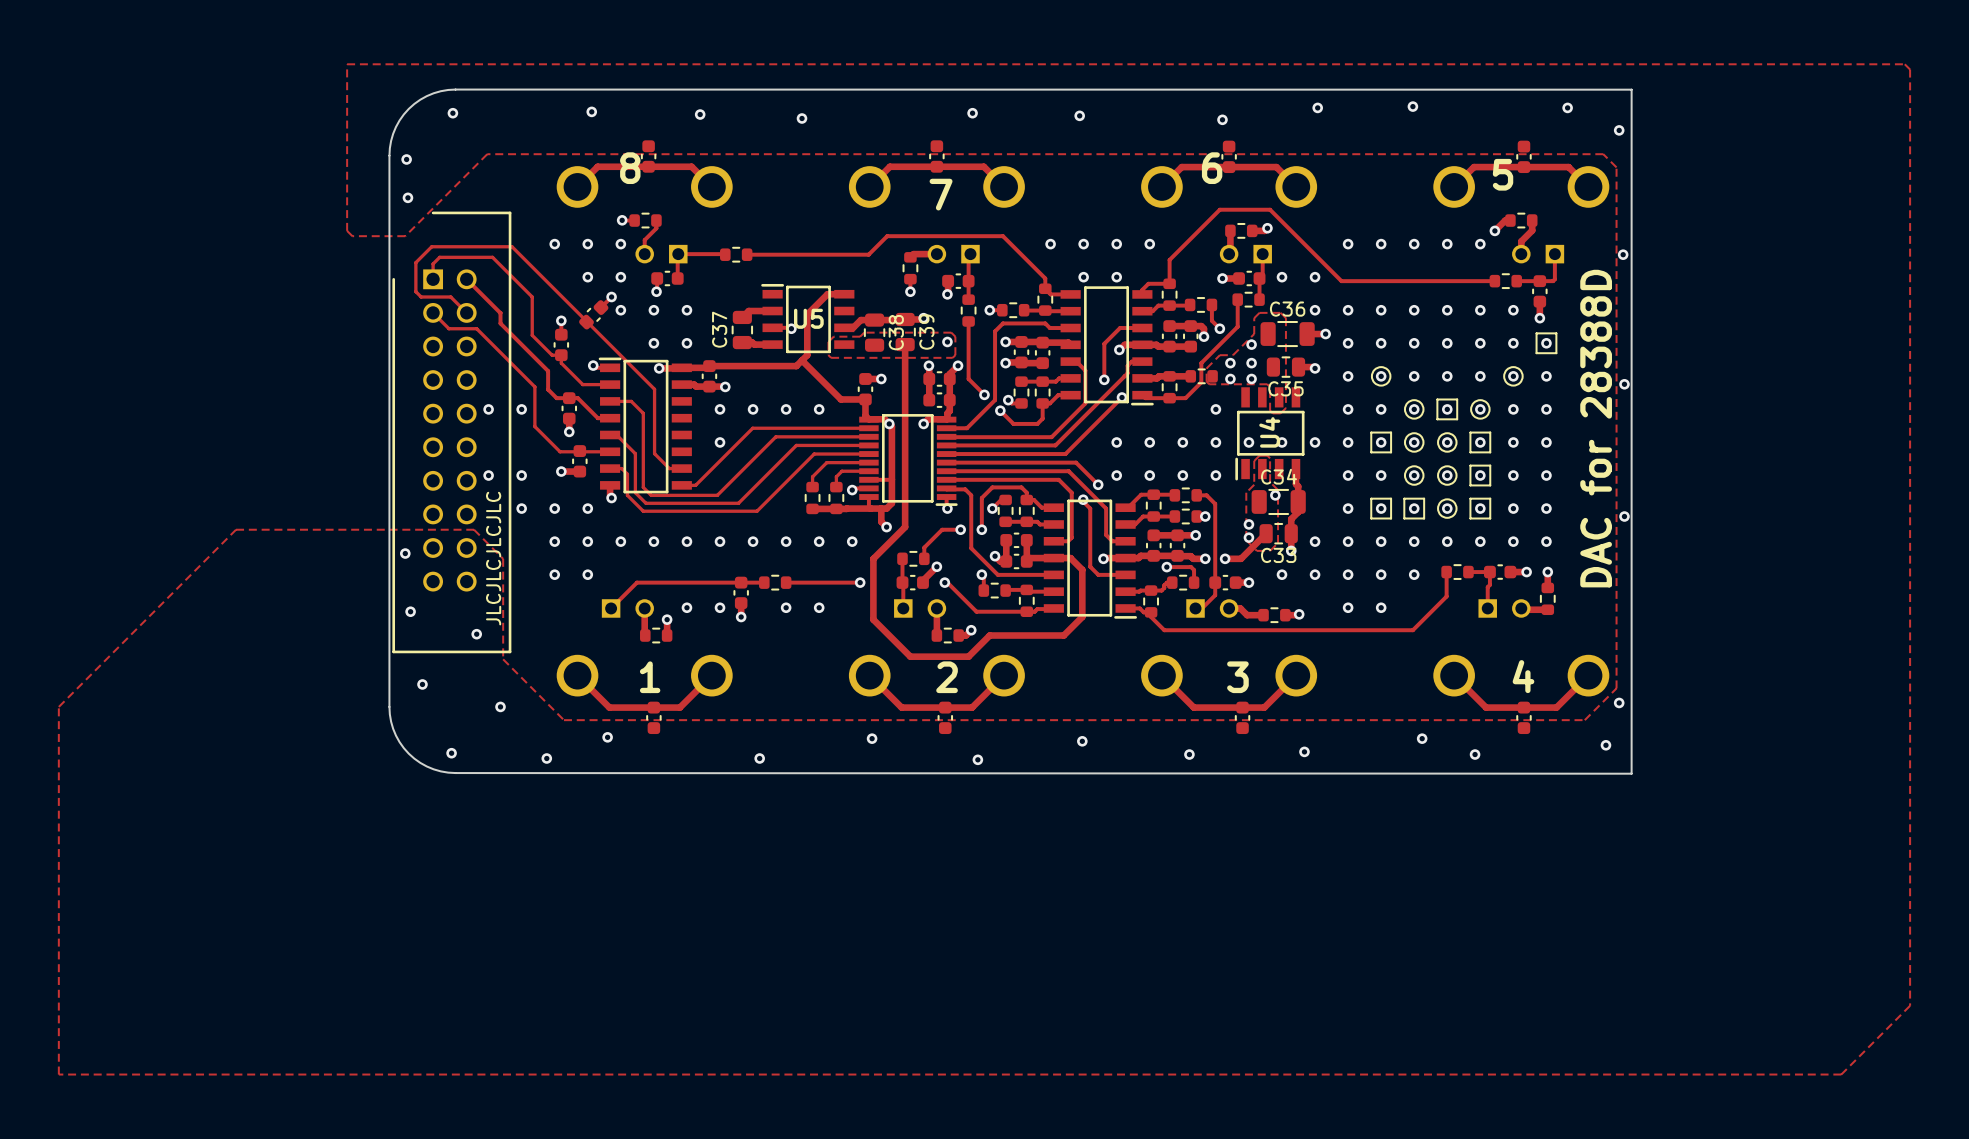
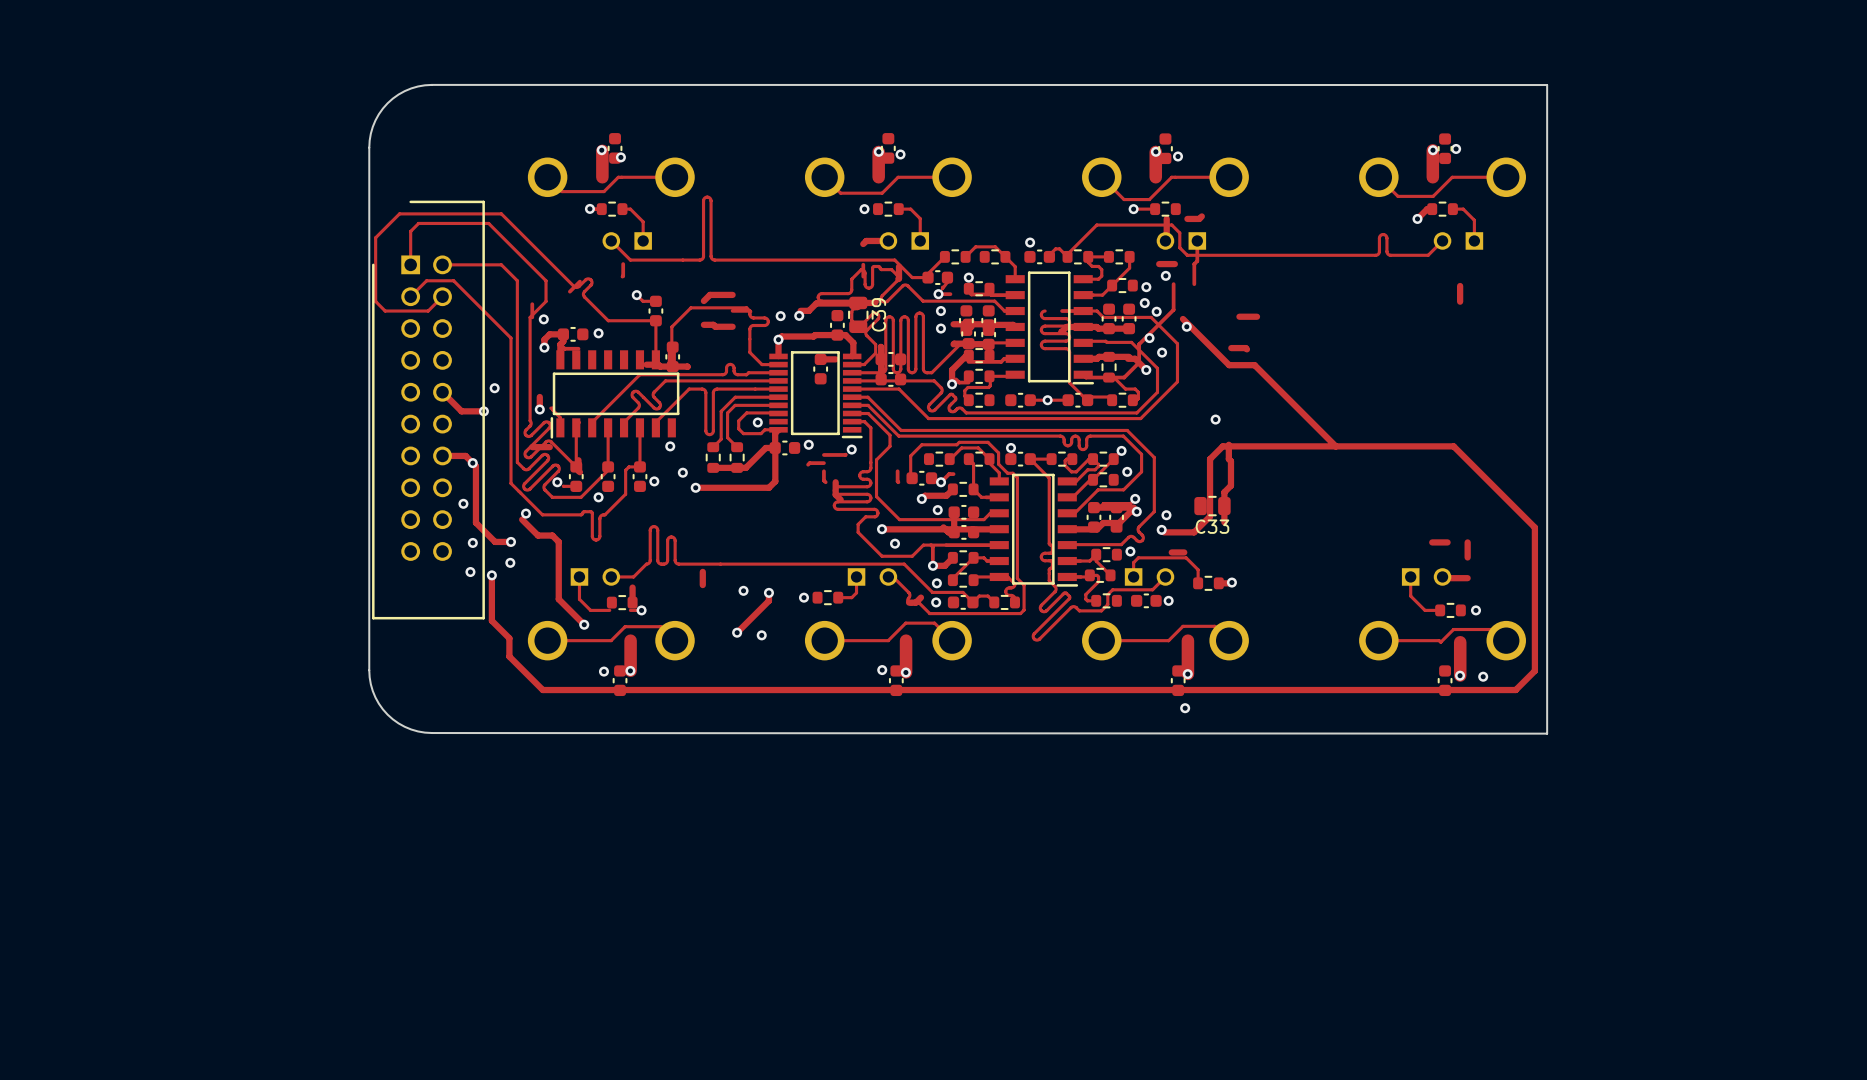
zone outline: (347, 64) (347, 230) (352, 236) (405, 236) (487, 154) (1603, 154) (1616, 167) (1616, 688) (1584, 720) (563, 720) (503, 659) (503, 558) (474, 529) (236, 529) (58, 706) (58, 1074) (1841, 1074) (1910, 1005) (1910, 69) (1904, 64) (347, 64) -> none
via: (1412, 106) -> none
via: (1317, 107) -> none
via: (1567, 107) -> none
via: (591, 111) -> none
via: (452, 113) -> none
via: (972, 113) -> none
via: (700, 114) -> none
via: (1079, 115) -> none
via: (801, 118) -> none
via: (1222, 119) -> none
via: (1619, 130) -> none
via: none -> (1456, 148)
track: none -> (601, 150) (602, 177)
via: none -> (601, 150)
track: none -> (1432, 150) (1432, 177)
via: none -> (1432, 150)
via: (406, 159) -> none
track: none -> (878, 151) (878, 177)
via: none -> (878, 151)
track: none -> (1155, 151) (1155, 177)
via: none -> (1155, 151)
via: none -> (900, 154)
via: none -> (620, 157)
via: none -> (1178, 156)
text: 8 (630, 168) -> none
text: 6 (1212, 168) -> none
text: 5 (1503, 174) -> none
track: (577, 186) (597, 166) (691, 166) (711, 186) -> (547, 177) (561, 191) (604, 191) (618, 177) (675, 177)
track: (869, 186) (889, 166) (983, 166) (1004, 186) -> (824, 177) (840, 193) (882, 193) (898, 177) (952, 177)
track: (1161, 186) (1181, 167) (1276, 167) (1296, 186) -> (1101, 177) (1124, 199) (1149, 199) (1171, 177) (1229, 177)
track: (1454, 186) (1474, 167) (1568, 167) (1588, 186) -> (1378, 177) (1397, 196) (1433, 196) (1452, 177) (1506, 177)
text: 7 (941, 194) -> none
via: (407, 197) -> none
track: (656, 220) (656, 228) (644, 240) (644, 254) -> (622, 209) (630, 209) (643, 221) (643, 240)
via: none -> (864, 209)
part: none -> (888, 209)
track: none -> (1133, 209) (1155, 209)
via: none -> (1133, 209)
track: (1532, 220) (1532, 230) (1521, 241) (1521, 254) -> (1452, 209) (1463, 209) (1474, 220) (1474, 240)
via: (1267, 228) -> none
part position: (1241, 230) -> (1165, 209)
via: (554, 244) -> none
via: (587, 244) -> none
via: (620, 244) -> none
via: (1050, 244) -> none
via: (1083, 244) -> none
via: (1116, 244) -> none
via: (1149, 244) -> none
via: (1348, 244) -> none
via: (1381, 244) -> none
via: (1414, 244) -> none
via: (1447, 244) -> none
via: (1480, 244) -> none
track: none -> (611, 240) (630, 260) (701, 259) (703, 256) (703, 200) (707, 197) (711, 200) (711, 256) (713, 259) (894, 260) (912, 277) (928, 277) (928, 273) (944, 256)
track: (725, 254) (678, 254) (677, 278) -> none
part: (736, 254) -> none
track: (747, 254) (868, 254) (887, 236) (1002, 236) (1045, 278) (1045, 289) (1050, 294) (1070, 294) -> (965, 256) (975, 246) (995, 246) (1015, 266) (1015, 279)
track: (970, 254) (968, 256) (968, 299) -> (920, 240) (920, 218) (910, 209) (898, 209)
track: none -> (1442, 240) (1428, 255) (1389, 255) (1386, 252) (1386, 237) (1383, 234) (1379, 237) (1379, 252) (1376, 255) (1187, 255) (1179, 247) (1179, 233) (1171, 225) (1096, 225) (1067, 254) (1067, 256) (1059, 248) (1055, 248) (1049, 256)
track: (1554, 254) (1554, 279) (1553, 281) (1516, 281) -> none
via: (1623, 254) -> none
via: none -> (1030, 242)
track: (433, 263) (439, 257) (492, 257) (532, 297) (532, 335) (552, 355) (561, 355) (561, 363) (582, 384) (610, 384) -> (410, 250) (410, 231) (418, 223) (488, 223) (546, 280) (546, 301) (530, 317) (531, 423) (525, 433) (530, 435) (545, 421) (549, 422) (550, 426) (525, 451) (525, 456) (530, 457) (546, 441) (549, 441) (576, 466) (576, 425) (579, 422)
part: (910, 268) -> none
part: none -> (955, 256)
part: none -> (995, 256)
part: none -> (1039, 256)
part: none -> (1077, 256)
part: none -> (1119, 256)
via: (587, 277) -> none
via: (620, 277) -> none
via: (1083, 277) -> none
via: (1116, 277) -> none
via: (1282, 277) -> none
via: (1315, 277) -> none
part: (667, 278) -> none
via: (1222, 278) -> none
part: (1249, 278) -> none
track: (466, 279) (500, 312) -> (442, 264) (501, 264) (517, 280) (517, 462) (526, 469) (543, 454) (546, 454) (548, 458) (524, 483) (524, 488) (529, 489) (556, 465) (559, 470) (544, 484) (544, 489) (552, 497) (581, 497) (608, 470) (608, 427)
part position: (958, 281) -> (937, 277)
track: (1494, 281) (1341, 281) (1270, 209) (1219, 209) (1169, 259) (1169, 283) (1148, 283) (1142, 289) (1142, 294) -> (1108, 256) (1088, 256) (1088, 262) (1092, 266) (1098, 266) (1101, 269) (1101, 276) (1098, 279) (1083, 279)
part: (1505, 281) -> none
via: none -> (1165, 275)
via: (656, 291) -> none
via: (910, 291) -> none
part: (1539, 291) -> none
track: none -> (947, 277) (947, 282) (942, 288) (942, 287)
via: none -> (968, 277)
track: (844, 294) (827, 294) (807, 314) (807, 355) (796, 366) (659, 368) -> none
via: (947, 294) -> none
part: (1169, 294) -> none
via: (611, 297) -> none
part: (1045, 299) -> none
part: (1248, 299) -> none
part: none -> (1122, 285)
via: none -> (1146, 287)
part: none -> (979, 288)
track: (1190, 304) (1158, 305) (1152, 311) -> (1129, 256) (1129, 268) (1102, 295) (1093, 295)
part: (1201, 304) -> none
track: (1211, 304) (1211, 320) (1219, 328) -> none
via: (620, 310) -> none
via: (653, 310) -> none
track: none -> (635, 294) (643, 301) (655, 301)
via: (686, 310) -> none
part: (968, 310) -> none
part: (1013, 310) -> none
via: (1315, 310) -> none
via: (1348, 310) -> none
via: (1381, 310) -> none
via: (1414, 310) -> none
via: (1447, 310) -> none
via: (1480, 310) -> none
via: (1513, 310) -> none
via: none -> (636, 295)
track: (433, 312) (448, 328) (476, 328) (534, 386) (534, 426) (560, 451) (610, 451) -> (410, 296) (426, 280) (453, 280) (510, 338) (510, 483) (542, 514) (581, 514) (583, 511) (591, 511) (592, 537) (595, 539) (598, 538) (600, 516) (604, 514) (625, 494) (625, 470) (628, 466) (639, 466) (639, 427)
track: (466, 312) (450, 297) (421, 297) (415, 291) (415, 262) (431, 246) (512, 246) (654, 389) (654, 453) (669, 468) (681, 468) -> (442, 296) (428, 311) (385, 311) (375, 301) (375, 237) (399, 213) (501, 213) (574, 286) (578, 286) (587, 279) (590, 279) (591, 284) (584, 292) (583, 295) (608, 320) (655, 320) (655, 359)
track: (500, 312) (500, 323) (548, 371) (548, 389) (556, 398) (577, 398) (597, 418) (610, 418) -> none
zone outline: (1259, 312) (1254, 318) (1254, 334) (1233, 355) (1219, 355) (1206, 368) (1206, 381) (1209, 384) (1267, 384) (1270, 386) (1270, 410) (1272, 413) (1280, 413) (1285, 408) (1285, 318) (1280, 312) (1259, 312) -> none
part: (593, 314) -> none
U5: (807, 318) -> none
via: (923, 318) -> none
via: (1539, 318) -> none
via: none -> (1144, 303)
via: (561, 320) -> none
track: (968, 321) (968, 378) (984, 394) -> none
track: (1169, 326) (1201, 326) (1203, 328) (1203, 336) -> none
part: none -> (655, 311)
via: (791, 328) -> none
via: none -> (940, 311)
track: (1059, 328) (1049, 328) (1045, 323) (1002, 323) (995, 331) (995, 400) (966, 428) (946, 428) -> (1004, 311) (994, 301) (923, 301) (905, 284) (887, 301) (883, 301) (881, 296) (897, 280) (897, 276) (891, 269) (881, 269) (879, 266) (873, 266) (872, 285) (868, 288) (865, 285) (864, 271) (861, 269) (851, 279) (849, 293) (821, 293) (818, 296) (821, 301) (859, 301) (860, 307) (851, 311) (851, 320) (857, 325) (861, 325) (873, 313) (878, 315) (878, 319) (865, 332) (875, 344) (875, 353) (864, 364) (852, 364)
track: none -> (1045, 311) (1041, 314) (1043, 318) (1066, 318) (1069, 322) (1066, 326) (1043, 326) (1041, 329) (1042, 332) (1066, 333) (1069, 337) (1066, 341) (1043, 341) (1042, 347) (1068, 350) (1069, 382) (1086, 400) (1092, 397) (1108, 397) (1112, 400)
track: (1120, 328) (1104, 343) (1104, 379) -> none
track: none -> (1083, 311) (1096, 311) (1103, 317) (1151, 317) (1177, 343) (1177, 381) (1140, 418) (928, 418) (899, 389) (852, 389)
C37: (742, 330) -> none
zone outline: (864, 332) (951, 332) (955, 336) (955, 355) (952, 357) (831, 357) (828, 355) (828, 341) (833, 336) (860, 336) (864, 332) -> none
C38: (874, 332) -> none
via: none -> (780, 316)
via: none -> (799, 315)
line: (1536, 333) (1556, 333) (1556, 353) (1536, 353) (1536, 333) -> none
C36: (1287, 334) -> none
via: (1325, 334) -> none
via: none -> (543, 319)
via: (1203, 336) -> none
track: none -> (1182, 318) (1229, 365) (1254, 365) (1335, 446)
part: none -> (966, 320)
part: none -> (988, 320)
via: (947, 341) -> none
via: (1005, 341) -> none
via: (653, 343) -> none
via: (686, 343) -> none
part: none -> (837, 325)
via: (1348, 343) -> none
via: (1381, 343) -> none
via: (1414, 343) -> none
via: (1447, 343) -> none
via: (1480, 343) -> none
via: (1513, 343) -> none
via: (1546, 343) -> none
part: (561, 344) -> none
track: (905, 344) (905, 527) (873, 558) (873, 619) (910, 656) (968, 656) (989, 635) (1063, 635) (1082, 617) (1082, 569) (1070, 558) (1030, 558) (1026, 561) (1026, 540) -> none
via: none -> (940, 328)
via: (1119, 349) -> none
via: none -> (598, 333)
part: none -> (573, 334)
via: none -> (1149, 338)
via: none -> (778, 339)
track: (801, 360) (841, 399) (865, 399) (865, 415) (868, 419) (884, 419) (891, 426) (891, 503) (886, 508) (812, 508) -> none
track: (1070, 361) (1076, 361) (1085, 370) (1085, 403) (1051, 437) (946, 436) -> (1015, 342) (961, 342) (931, 372) (926, 372) (923, 369) (923, 316) (918, 313) (915, 316) (915, 370) (912, 372) (908, 369) (908, 320) (904, 316) (900, 320) (900, 369) (896, 372) (893, 369) (893, 320) (889, 316) (885, 320) (885, 370) (882, 372) (852, 372)
track: (1142, 361) (1131, 361) (1127, 365) (1127, 373) (1055, 445) (946, 445) -> (1083, 342) (1084, 341) (1131, 342) (1157, 368) (1157, 392) (1136, 412) (966, 412) (960, 407) (953, 411) (949, 410) (949, 406) (955, 399) (951, 394) (934, 410) (929, 409) (929, 405) (942, 390) (934, 380) (852, 380)
via: (1005, 363) -> none
via: (1230, 363) -> none
via: (1251, 363) -> none
via: (593, 365) -> none
via: (928, 365) -> none
track: (958, 365) (949, 374) (949, 411) (947, 413) (947, 418) (928, 419) (923, 423) -> none
via: (958, 365) -> none
track: none -> (544, 347) (544, 339) (549, 334) (563, 334) (563, 341) (560, 344) (560, 359)
via: none -> (544, 347)
drawing: [1370, 366, 1392, 387] -> none
drawing: [1503, 366, 1524, 387] -> none
C35: (1285, 367) -> none
via: (659, 368) -> none
via: (1315, 368) -> none
via: none -> (1162, 352)
track: none -> (778, 356) (778, 339) (781, 336) (815, 335) (845, 335) (853, 342) (852, 356)
track: none -> (968, 355) (966, 355) (952, 369) (952, 384)
part: none -> (979, 355)
part: (1201, 376) -> none
via: (1348, 376) -> none
via: (1381, 376) -> none
via: (1414, 376) -> none
via: (1447, 376) -> none
via: (1480, 376) -> none
via: (1513, 376) -> none
via: (1546, 376) -> none
via: (881, 378) -> none
track: none -> (1128, 358) (1135, 358) (1146, 370)
via: (1230, 378) -> none
via: (1251, 378) -> none
track: none -> (671, 359) (671, 326) (690, 307) (746, 307) (751, 317) (765, 318) (768, 321) (765, 325) (750, 327) (749, 352) (762, 364) (778, 364)
via: (1104, 379) -> none
via: (1624, 384) -> none
via: (725, 386) -> none
via: none -> (1146, 370)
part: (1021, 392) -> none
part: (1042, 392) -> none
track: none -> (778, 372) (737, 374) (734, 372) (733, 365) (730, 364) (727, 365) (726, 372) (723, 374) (639, 374) (592, 422) (592, 427)
via: (984, 394) -> none
track: (1070, 395) (1058, 395) (1049, 403) (1042, 403) (1042, 418) (1037, 423) (1013, 423) (1000, 410) -> (1015, 374) (989, 376) (988, 387) (967, 387) (964, 390) (964, 396) (968, 400)
part: none -> (979, 376)
track: (1122, 397) (1065, 454) (946, 454) -> none
via: (1122, 397) -> none
track: none -> (1114, 378) (1125, 389) (1135, 389) (1138, 392) (1138, 398) (1132, 400)
drawing: [1403, 399, 1458, 519] -> none
line: (1437, 399) (1457, 399) (1457, 419) (1437, 419) (1437, 399) -> none
drawing: [1470, 399, 1491, 420] -> none
via: (1008, 400) -> none
track: (610, 401) (631, 401) (643, 413) (643, 487) (651, 495) (717, 495) (775, 436) (868, 436) -> none
track: none -> (778, 380) (665, 380) (653, 393) (660, 404) (657, 408) (654, 408) (637, 391) (632, 392) (632, 396) (639, 406) (624, 422) (624, 427)
via: none -> (952, 384)
part: (569, 408) -> none
via: (488, 409) -> none
via: (720, 409) -> none
via: (753, 409) -> none
via: (786, 409) -> none
via: (819, 409) -> none
via: (1215, 409) -> none
via: (1348, 409) -> none
via: (1381, 409) -> none
via: (1414, 409) -> none
via: (1447, 409) -> none
via: (1480, 409) -> none
via: (1513, 409) -> none
via: (1546, 409) -> none
track: none -> (778, 389) (715, 389) (713, 392) (713, 431) (709, 434) (705, 431) (705, 391) (702, 389) (689, 389) (655, 422) (655, 427)
via: (1000, 410) -> none
track: none -> (442, 392) (461, 411) (483, 411)
track: none -> (778, 397) (735, 397) (721, 411) (721, 439) (713, 447)
part: none -> (979, 400)
part: none -> (1020, 400)
track: none -> (1030, 400) (1068, 400)
via: none -> (1047, 400)
part: none -> (1077, 400)
part: none -> (1122, 400)
via: (889, 423) -> none
via: (923, 423) -> none
part rotation: 0° (645, 425) -> 90° counterclockwise (615, 394)
track: none -> (778, 405) (735, 405) (727, 412) (727, 437) (737, 447)
track: (868, 428) (752, 428) (695, 485) (681, 485) -> none
text: DAC for 28388D (1596, 428) -> none
track: none -> (550, 408) (560, 417) (560, 427)
line: (1371, 432) (1391, 432) (1391, 452) (1371, 452) (1371, 432) -> none
line: (1470, 432) (1490, 432) (1490, 452) (1470, 452) (1470, 432) -> none
via: none -> (483, 411)
U4: (1269, 433) -> none
track: (610, 434) (616, 434) (635, 453) (635, 492) (645, 503) (738, 503) (796, 445) (868, 445) -> none
track: none -> (778, 413) (746, 412) (738, 420) (738, 428) (743, 433) (761, 433) (764, 429) (778, 429)
via: (720, 442) -> none
via: (1116, 442) -> none
via: (1149, 442) -> none
via: (1182, 442) -> none
via: (1215, 442) -> none
via: (1248, 442) -> none
via: (1315, 442) -> none
via: (1348, 442) -> none
via: (1381, 442) -> none
via: (1414, 442) -> none
via: (1447, 442) -> none
via: (1480, 442) -> none
via: (1513, 442) -> none
via: (1546, 442) -> none
via: none -> (757, 422)
track: none -> (778, 430) (775, 433) (775, 447) (765, 447) (745, 467) (713, 467)
track: (868, 454) (814, 454) (757, 511) (643, 511) (627, 495) (627, 474) (621, 468) (610, 468) -> none
zone outline: (1259, 455) (1254, 460) (1254, 484) (1246, 492) (1246, 540) (1256, 550) (1270, 550) (1278, 542) (1278, 490) (1270, 482) (1270, 458) (1267, 455) (1259, 455) -> none
part position: (908, 459) -> (815, 394)
part: (579, 461) -> none
track: (868, 462) (826, 462) (812, 476) (812, 487) -> none
track: (946, 462) (1076, 462) (1098, 484) -> none
line: (1470, 465) (1470, 485) (1490, 485) (1490, 465) (1470, 465) -> none
via: none -> (670, 446)
via: (561, 471) -> none
track: (868, 471) (841, 471) (836, 476) (836, 487) -> none
track: (946, 471) (1068, 471) (1106, 508) (1106, 535) (1112, 541) (1125, 541) -> (852, 405) (868, 405) (898, 436) (1060, 436) (1067, 445) (1071, 443) (1072, 437) (1075, 436) (1079, 438) (1079, 447) (1082, 449) (1086, 447) (1086, 438) (1089, 436) (1123, 436) (1141, 454) (1141, 471) (1123, 489) (1098, 489) (1074, 513) (1067, 513)
track: none -> (775, 448) (775, 481) (768, 487) (695, 487)
part: none -> (784, 447)
via: none -> (1011, 447)
via: none -> (851, 449)
via: (488, 475) -> none
via: (521, 475) -> none
via: (1116, 475) -> none
via: (1149, 475) -> none
via: (1215, 475) -> none
via: (1348, 475) -> none
via: (1381, 475) -> none
via: (1414, 475) -> none
via: (1447, 475) -> none
via: (1480, 475) -> none
via: (1513, 475) -> none
via: (1546, 475) -> none
track: (946, 479) (1058, 479) (1071, 492) (1071, 537) (1068, 541) (1053, 541) -> (852, 413) (868, 413) (889, 435) (889, 446) (876, 459) (876, 496) (899, 519) (983, 519) (990, 513) (999, 513)
track: none -> (442, 455) (465, 455) (475, 466) (475, 522) (495, 541) (510, 541) (509, 543)
part: none -> (713, 457)
part: none -> (737, 457)
part: none -> (939, 459)
part: none -> (979, 459)
part: none -> (1020, 459)
via: (1098, 484) -> none
track: none -> (1051, 459) (1030, 459) (1049, 478) (1049, 543) (1052, 546) (1052, 551) (1043, 553) (1041, 557) (1043, 560) (1052, 561) (1052, 567) (1049, 569) (1049, 580) (1056, 589) (1041, 605) (1040, 609) (1046, 611) (1064, 592) (1069, 597) (1034, 634) (1034, 639) (1039, 639) (1071, 606) (1075, 606) (1079, 610) (1101, 610) (1107, 604) (1107, 594) (1112, 589) (1152, 589) (1165, 576)
part: none -> (1061, 459)
part: none -> (1103, 459)
via: none -> (472, 463)
track: (946, 488) (965, 489) (971, 495) (971, 548) (997, 574) -> (852, 421) (864, 421) (870, 427) (870, 468) (868, 471) (861, 472) (859, 475) (862, 478) (869, 480) (870, 483) (867, 486) (837, 486) (834, 491) (837, 494) (867, 494) (870, 498) (867, 501) (837, 501) (834, 504) (835, 507) (876, 510) (876, 516) (865, 516) (858, 524) (858, 532) (882, 556) (912, 556) (923, 545) (946, 545)
via position: (852, 490) -> (808, 444)
track: (1174, 495) (1141, 494) (1128, 507) -> (1072, 459) (1065, 460) (1065, 465) (1071, 471) (1076, 471) (1089, 459) (1093, 459) (1098, 466) (1095, 469) (1087, 469) (1076, 481) (1069, 481)
part: (1185, 495) -> none
track: (1196, 495) (1206, 495) (1215, 503) (1215, 595) (1201, 608) (1195, 608) -> none
via: (1275, 495) -> none
via: none -> (1127, 471)
via: (611, 498) -> none
via: none -> (682, 472)
part: (812, 498) -> none
part: (836, 498) -> none
line: (1371, 498) (1391, 498) (1391, 518) (1371, 518) (1371, 498) -> none
line: (1404, 498) (1424, 498) (1424, 518) (1404, 518) (1404, 498) -> none
line: (1470, 498) (1470, 518) (1490, 518) (1490, 498) (1470, 498) -> none
track: (1083, 499) (1090, 508) (1090, 566) (1098, 574) (1125, 574) -> (852, 397) (867, 397) (901, 430) (1127, 430) (1154, 457) (1154, 511) (1138, 528) (1143, 539) (1138, 541) (1130, 536) (1121, 544) (1067, 545)
via: (1083, 499) -> none
C34: (1278, 501) -> none
part: none -> (576, 476)
part: none -> (608, 476)
part: none -> (639, 476)
part: none -> (921, 478)
part rotation: 0° (1153, 505) -> 90° clockwise (1103, 479)
via: none -> (654, 481)
track: (1053, 507) (1041, 507) (1034, 499) (1026, 499) (1026, 492) (1021, 487) (992, 487) (981, 498) (981, 529) -> (999, 481) (999, 472) (978, 447) (961, 447) (949, 459)
via: (521, 508) -> none
via: (554, 508) -> none
via: (947, 508) -> none
via: (1348, 508) -> none
via: (1381, 508) -> none
via: (1414, 508) -> none
via: (1447, 508) -> none
via: (1480, 508) -> none
via: (1513, 508) -> none
via: (1546, 508) -> none
part: (1005, 510) -> none
part: (1026, 510) -> none
track: none -> (563, 486) (576, 486)
via: none -> (695, 487)
track: none -> (952, 489) (946, 495) (925, 495) (921, 498)
part: none -> (963, 489)
track: (1174, 516) (1143, 516) (1135, 524) (1131, 524) -> (1113, 459) (1072, 497)
part: (1185, 516) -> none
via: (1205, 516) -> none
via: (1624, 516) -> none
track: (1005, 521) (1037, 521) (1040, 524) -> (968, 459) (973, 463) (973, 489) (981, 497) (986, 497)
via: none -> (598, 497)
via: (1248, 524) -> none
via: none -> (921, 498)
track: none -> (1135, 498) (1130, 503) (1103, 503) (1097, 509)
via: none -> (1135, 498)
via: (886, 527) -> none
track: (960, 529) (942, 529) (924, 547) (924, 558) -> none
via: (960, 529) -> none
via: (981, 529) -> none
via: none -> (463, 503)
track: (1266, 533) (1241, 558) (1225, 558) -> none
via: (1195, 535) -> none
via: none -> (937, 510)
via: (1248, 537) -> none
track: none -> (1136, 511) (1130, 511) (1119, 522) (1103, 522) (1096, 529) (1067, 529)
via: none -> (1136, 511)
via: (587, 541) -> none
via: (620, 541) -> none
via: (653, 541) -> none
via: (686, 541) -> none
via: (720, 541) -> none
via: (753, 541) -> none
via: (786, 541) -> none
via: (819, 541) -> none
via: (852, 541) -> none
via: (1315, 541) -> none
via: (1348, 541) -> none
via: (1381, 541) -> none
via: (1414, 541) -> none
via: (1447, 541) -> none
via: (1480, 541) -> none
via: (1513, 541) -> none
via: (1546, 541) -> none
via: none -> (1166, 515)
track: none -> (522, 519) (538, 535) (552, 535) (558, 541) (558, 599) (584, 624)
via: (1291, 550) -> none
via: (405, 553) -> none
via: (995, 556) -> none
text: JLCJLCJLCJLC (493, 558) -> none
track: (902, 558) (903, 608) -> (838, 597) (851, 597) (856, 592) (856, 576)
part: (913, 558) -> none
track: none -> (882, 529) (999, 529)
via: none -> (882, 529)
track: (1103, 558) (1138, 558) (1140, 555) (1190, 556) (1193, 558) (1205, 558) -> none
via: (1103, 558) -> none
via: (1205, 558) -> none
track: none -> (1163, 532) (1194, 532) (1210, 516) (1210, 459) (1222, 446) (1453, 446) (1534, 527) (1534, 670) (1515, 690) (542, 690) (509, 656) (509, 638) (491, 620) (491, 575)
track: (936, 566) (922, 582) -> none
via: (936, 566) -> none
track: (1166, 567) (1191, 567) (1194, 570) (1194, 582) -> none
via: (1166, 567) -> none
via: none -> (510, 541)
via: none -> (472, 542)
track: (1446, 572) (1446, 596) (1412, 630) (1164, 630) (1151, 617) (1151, 612) (1143, 612) (1139, 608) -> (1096, 600) (1087, 600) (1085, 594) (1098, 581) (1098, 576) (1096, 575) (1080, 576)
part: (1457, 572) -> none
track: (1468, 572) (1489, 572) (1487, 608) -> (1440, 610) (1425, 610) (1410, 596) (1410, 576)
part: (1500, 572) -> none
via: (1526, 572) -> none
via: (1547, 572) -> none
via: none -> (895, 543)
via: (554, 574) -> none
via: (587, 574) -> none
via: (981, 574) -> none
via: (1282, 574) -> none
via: (1315, 574) -> none
via: (1348, 574) -> none
via: (1381, 574) -> none
via: (1414, 574) -> none
via: none -> (1130, 551)
track: (764, 582) (636, 582) (611, 608) -> (609, 610) (590, 610) (579, 599) (579, 576)
part: (775, 582) -> none
track: (786, 582) (860, 582) -> none
via: (860, 582) -> none
part: (912, 582) -> none
track: (944, 582) (947, 582) (976, 611) (1034, 611) (1037, 609) (1053, 608) -> none
via: (944, 582) -> none
track: (1172, 582) (1166, 582) (1161, 590) (1139, 591) -> (1110, 575) (1096, 561) (1096, 554) (1089, 561) (1080, 561)
part position: (1183, 582) -> (1106, 554)
part position: (1225, 582) -> (1146, 600)
via: (1248, 582) -> none
track: none -> (952, 557) (944, 565) (932, 565)
part: none -> (963, 557)
part: (994, 590) -> none
track: (1005, 590) (1041, 591) -> (952, 580) (973, 557) (983, 557) (987, 561)
part: (741, 592) -> none
via: none -> (510, 562)
via: none -> (932, 565)
part rotation: 0° (1547, 598) -> 90° clockwise (1450, 610)
part position: (1547, 598) -> (1450, 610)
part: (1026, 600) -> none
part rotation: 0° (1151, 601) -> 90° clockwise (1100, 575)
via: none -> (470, 572)
via: none -> (491, 575)
via: (686, 607) -> none
via: (720, 607) -> none
via: (786, 607) -> none
via: (819, 607) -> none
via: (1348, 607) -> none
via: (1381, 607) -> none
track: (644, 608) (644, 635) -> (611, 576) (633, 576) (649, 562) (650, 529) (654, 526) (657, 529) (657, 560) (660, 563) (667, 561) (667, 540) (671, 536) (675, 539) (675, 560) (677, 563) (904, 564) (932, 592) (962, 592) (972, 602) (979, 596) (987, 596) (994, 602)
track: (936, 608) (936, 635) -> (888, 576) (893, 576) (909, 592) (909, 603) (918, 602) (929, 613) (1020, 613) (1024, 610) (1024, 585) (1017, 578) (1017, 477) (1012, 473) (1007, 473) (998, 464) (998, 452) (987, 442) (921, 444) (910, 455) (912, 478)
track: (1229, 608) (1240, 608) (1247, 615) (1263, 615) -> (1133, 576) (1133, 562) (1138, 557) (1186, 557) (1198, 569) (1198, 583)
via: (410, 611) -> none
part: none -> (963, 580)
track: none -> (973, 580) (976, 576) (1007, 576) (1014, 584) (1013, 587) (1006, 588) (1005, 592) (1013, 596) (1014, 602)
via: none -> (936, 583)
via: (741, 617) -> none
via: (667, 619) -> none
via: none -> (743, 590)
track: none -> (768, 592) (768, 600) (737, 632)
via: none -> (768, 592)
via: none -> (803, 597)
part: none -> (827, 597)
via: (971, 630) -> none
part: none -> (1106, 600)
via: none -> (1168, 600)
via: (476, 634) -> none
part: (947, 635) -> none
via: none -> (936, 602)
part: none -> (963, 602)
part: none -> (1004, 602)
track: none -> (630, 610) (641, 610)
via: none -> (641, 610)
via: none -> (1475, 610)
via: none -> (584, 624)
via: none -> (737, 632)
via: none -> (761, 635)
track: (577, 675) (609, 707) (679, 707) (711, 675) -> (547, 640) (611, 640) (625, 626) (661, 626) (675, 640)
track: none -> (630, 640) (630, 670)
track: (869, 675) (901, 707) (972, 707) (1004, 675) -> (824, 640) (888, 640) (905, 623) (934, 623) (952, 640)
track: none -> (906, 640) (906, 672)
track: (1161, 675) (1193, 707) (1264, 707) (1296, 675) -> (1101, 640) (1168, 640) (1182, 626) (1214, 626) (1229, 640)
track: none -> (1187, 640) (1187, 673)
track: (1454, 675) (1486, 707) (1556, 707) (1588, 675) -> (1378, 640) (1439, 640) (1440, 642) (1453, 629) (1495, 629) (1506, 640)
text: 4 (1523, 676) -> none
text: 1 (650, 677) -> none
text: 2 (947, 677) -> none
text: 3 (1237, 677) -> none
track: none -> (1460, 642) (1460, 675)
via: (422, 684) -> none
via: (1619, 702) -> none
via: (500, 706) -> none
via: none -> (882, 670)
via: none -> (630, 670)
via: none -> (603, 671)
via: none -> (905, 672)
via: none -> (1187, 674)
via: none -> (1460, 675)
via: none -> (1483, 676)
via: (607, 737) -> none
via: (872, 738) -> none
via: (1422, 738) -> none
via: (1082, 741) -> none
via: (1605, 745) -> none
via: none -> (1185, 708)
via: (1304, 751) -> none
via: (451, 753) -> none
via: (1189, 754) -> none
via: (1475, 754) -> none
via: (546, 758) -> none
via: (759, 758) -> none
via: (977, 759) -> none

